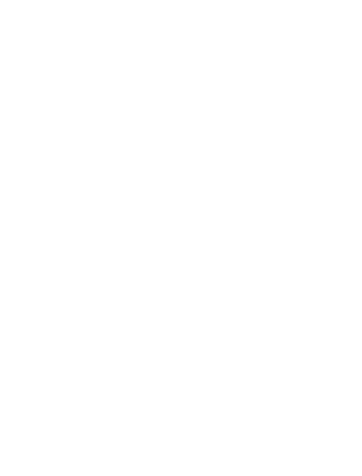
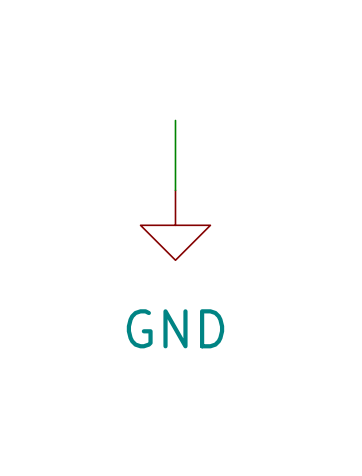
wire: none -> (175, 120) (175, 190)
power symbol: none -> GND (175, 225)

